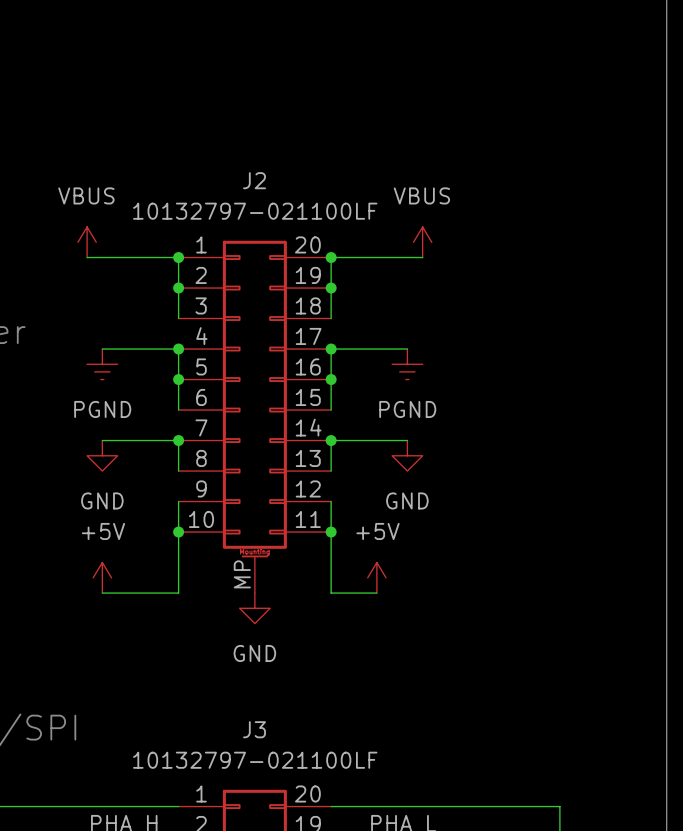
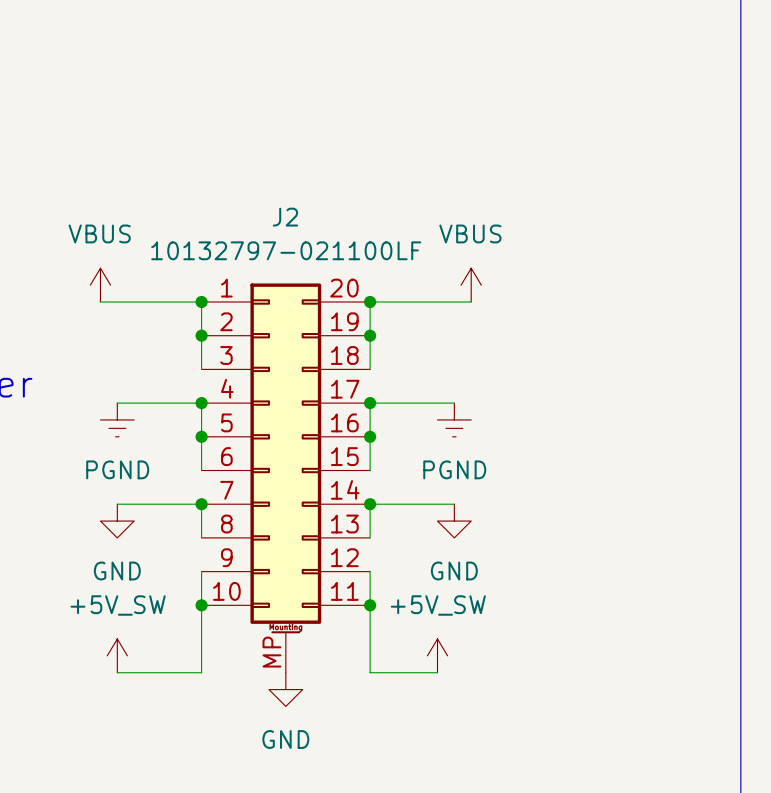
power symbol: +5V (102, 577) -> +5V_SW (117, 655)
power symbol: +5V (376, 577) -> none
power symbol: none -> +5V_SW (437, 655)
wire: none -> (420, 672) (437, 672)

